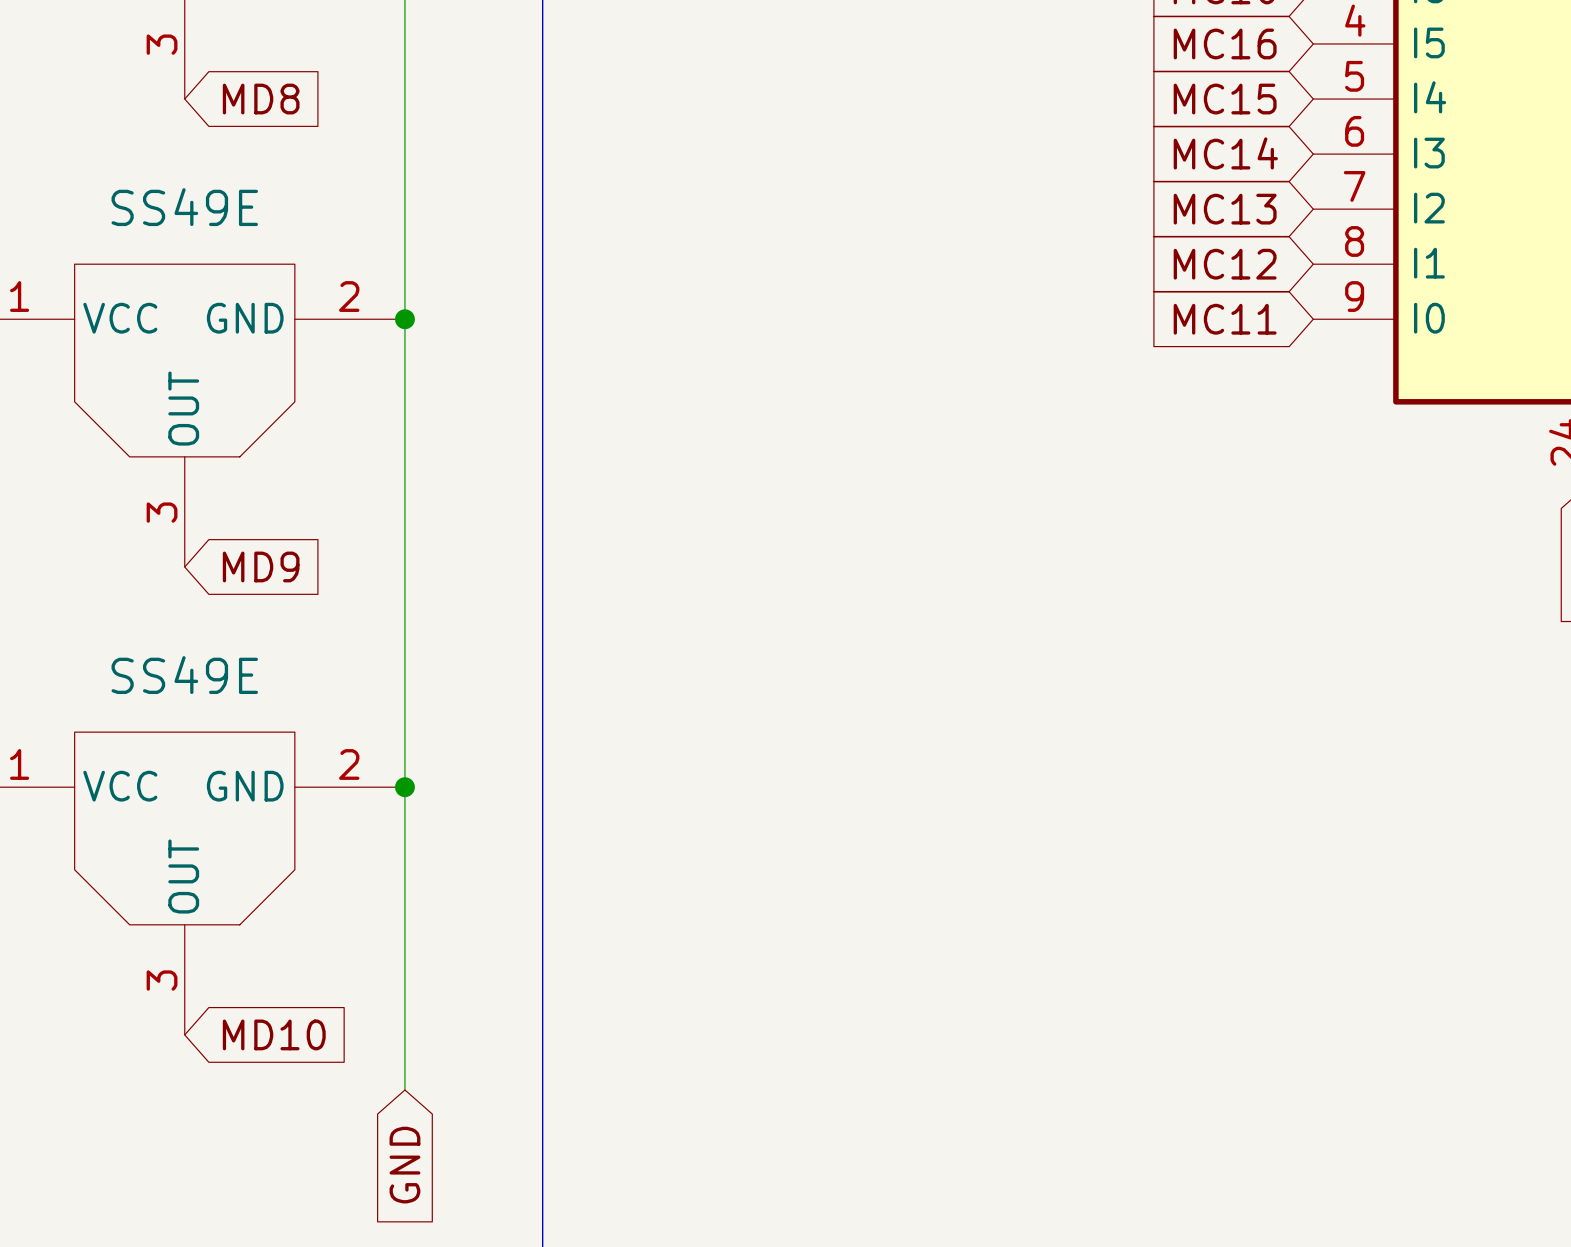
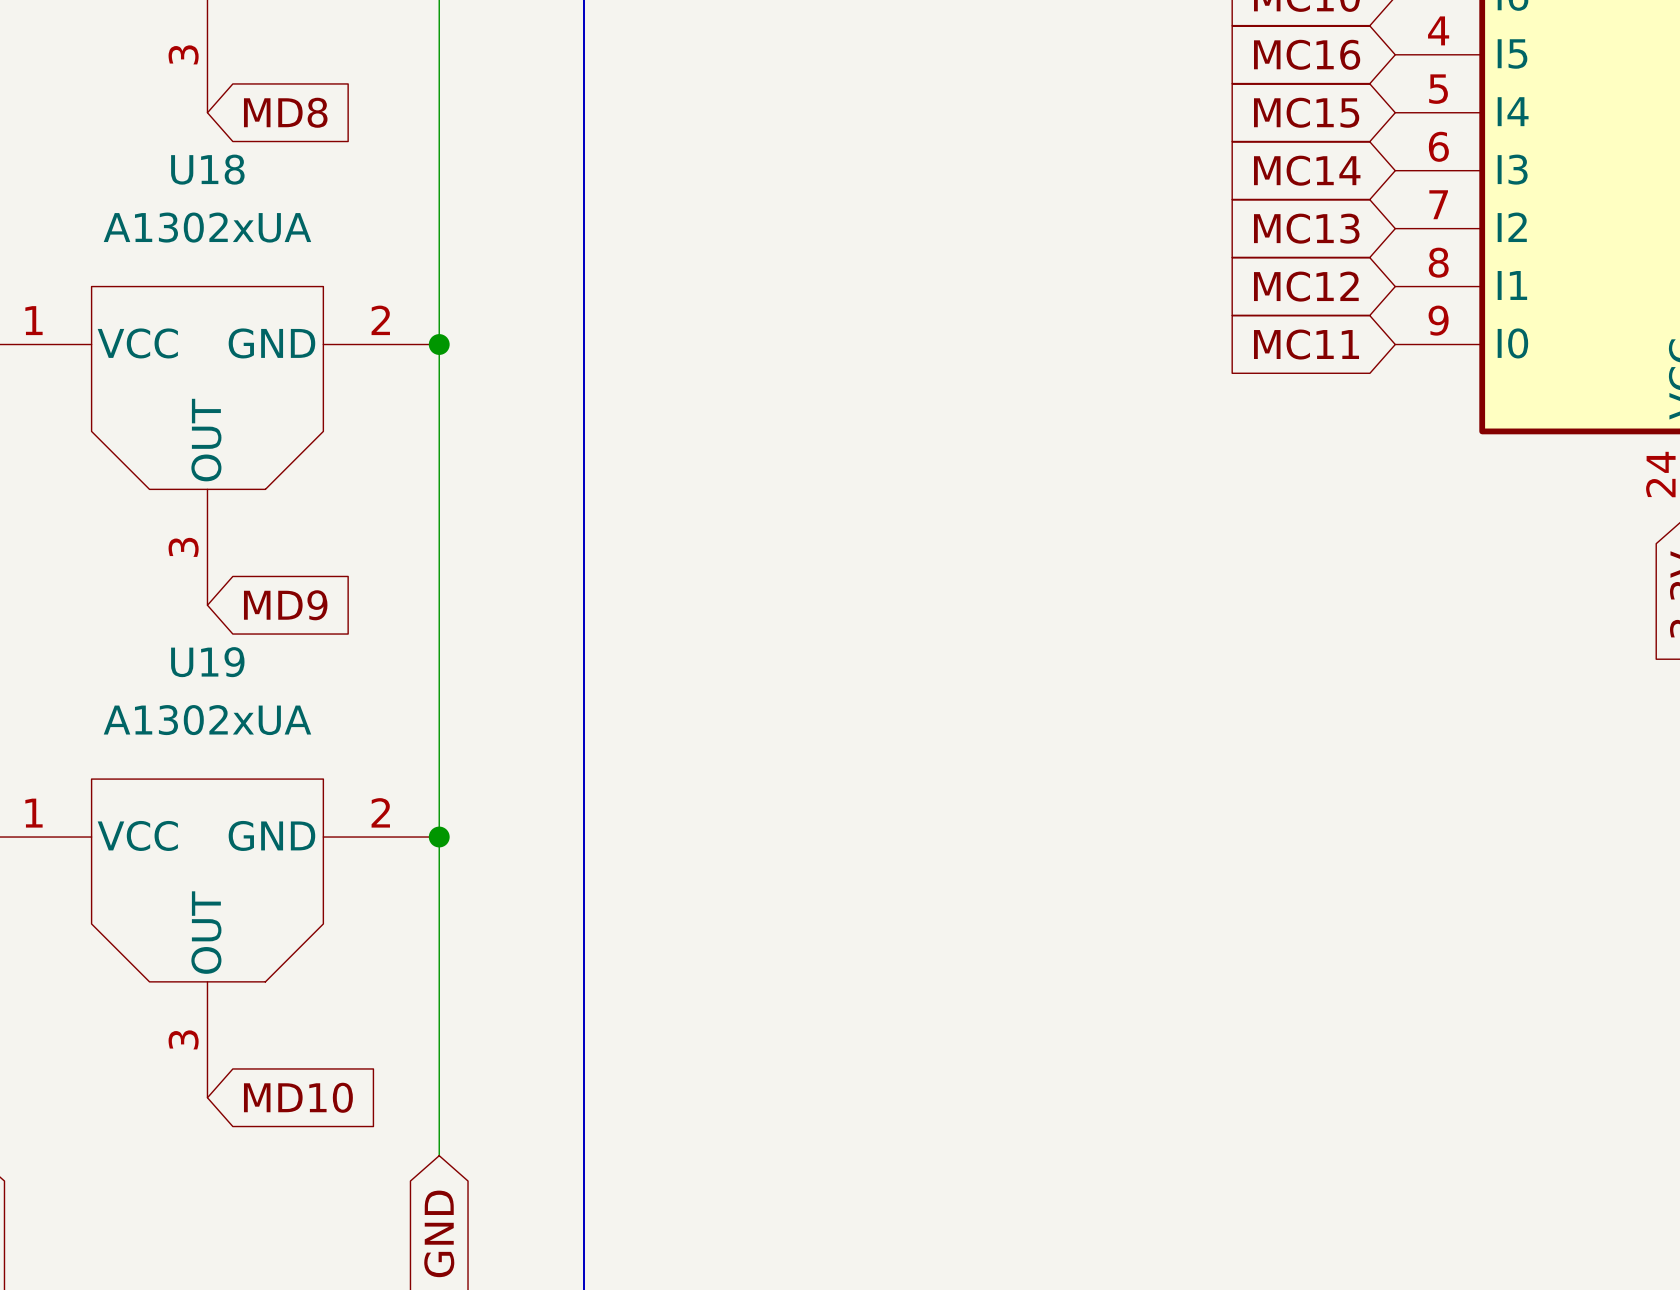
U18 name: none -> U18 (207, 169)
U18 value: SS49E (184, 207) -> A1302xUA (207, 227)
U19 name: none -> U19 (207, 662)
U19 value: SS49E (184, 675) -> A1302xUA (207, 720)

